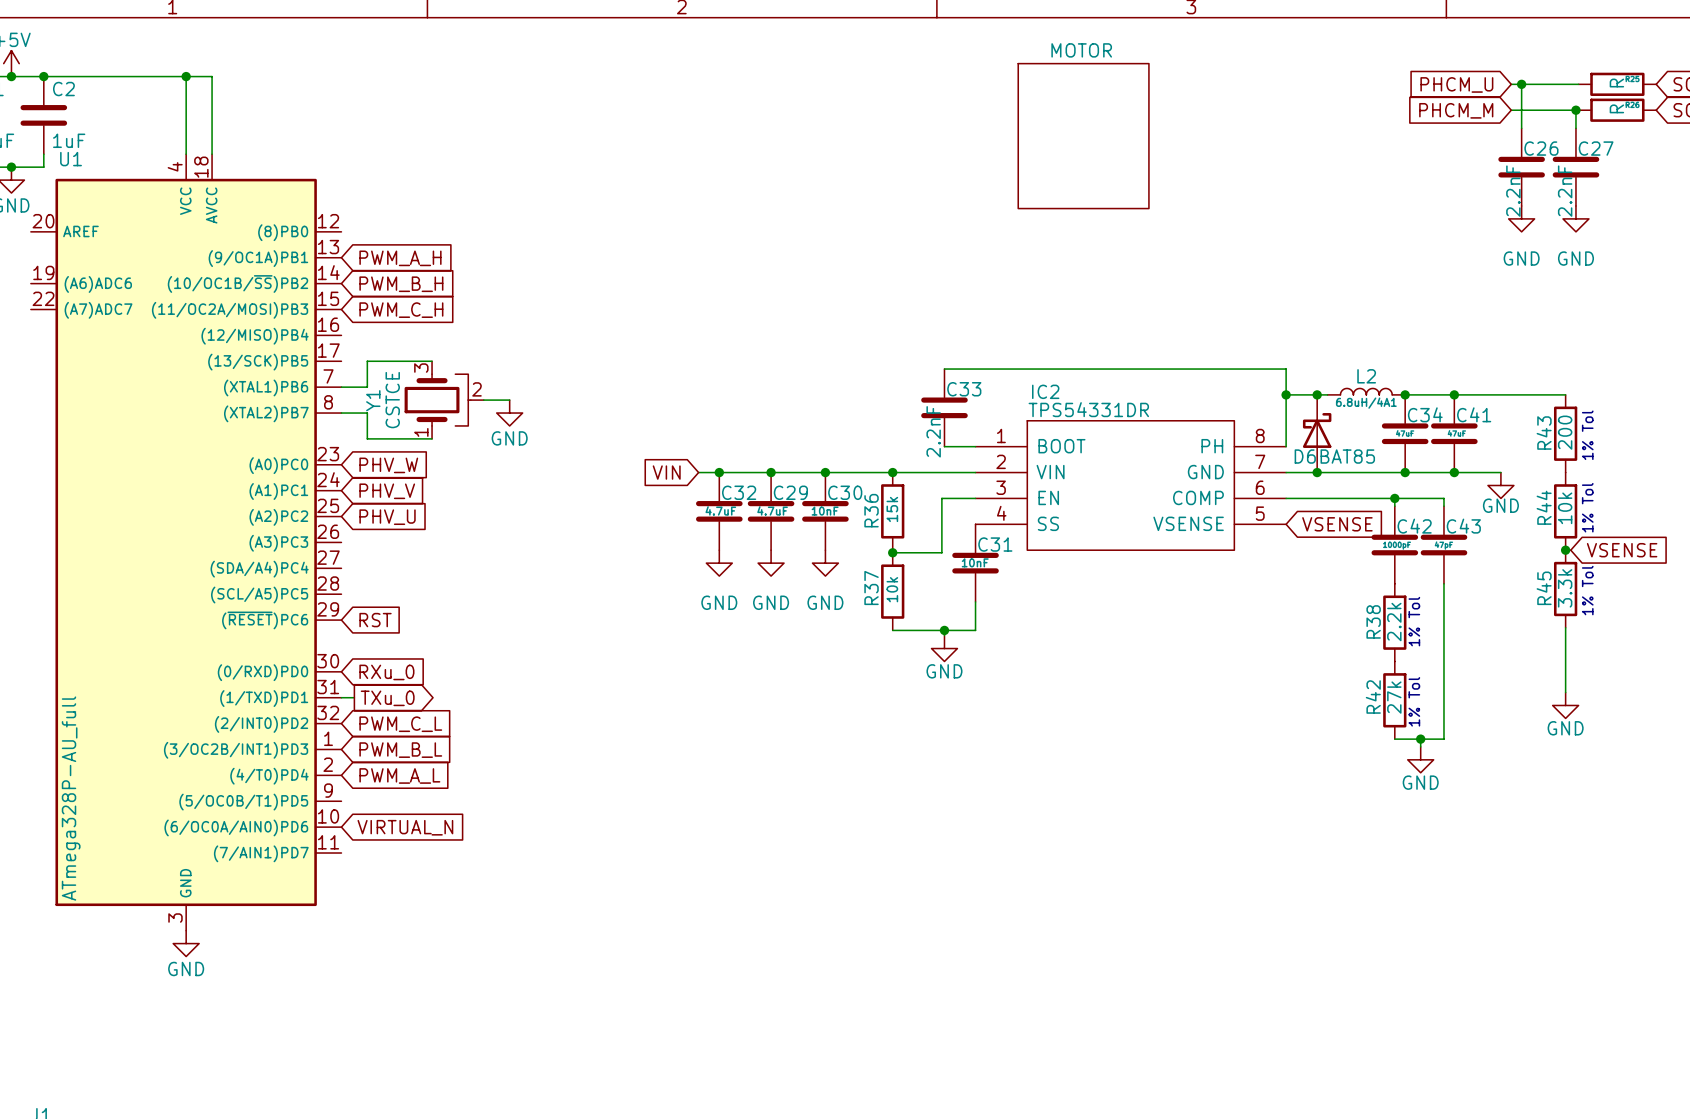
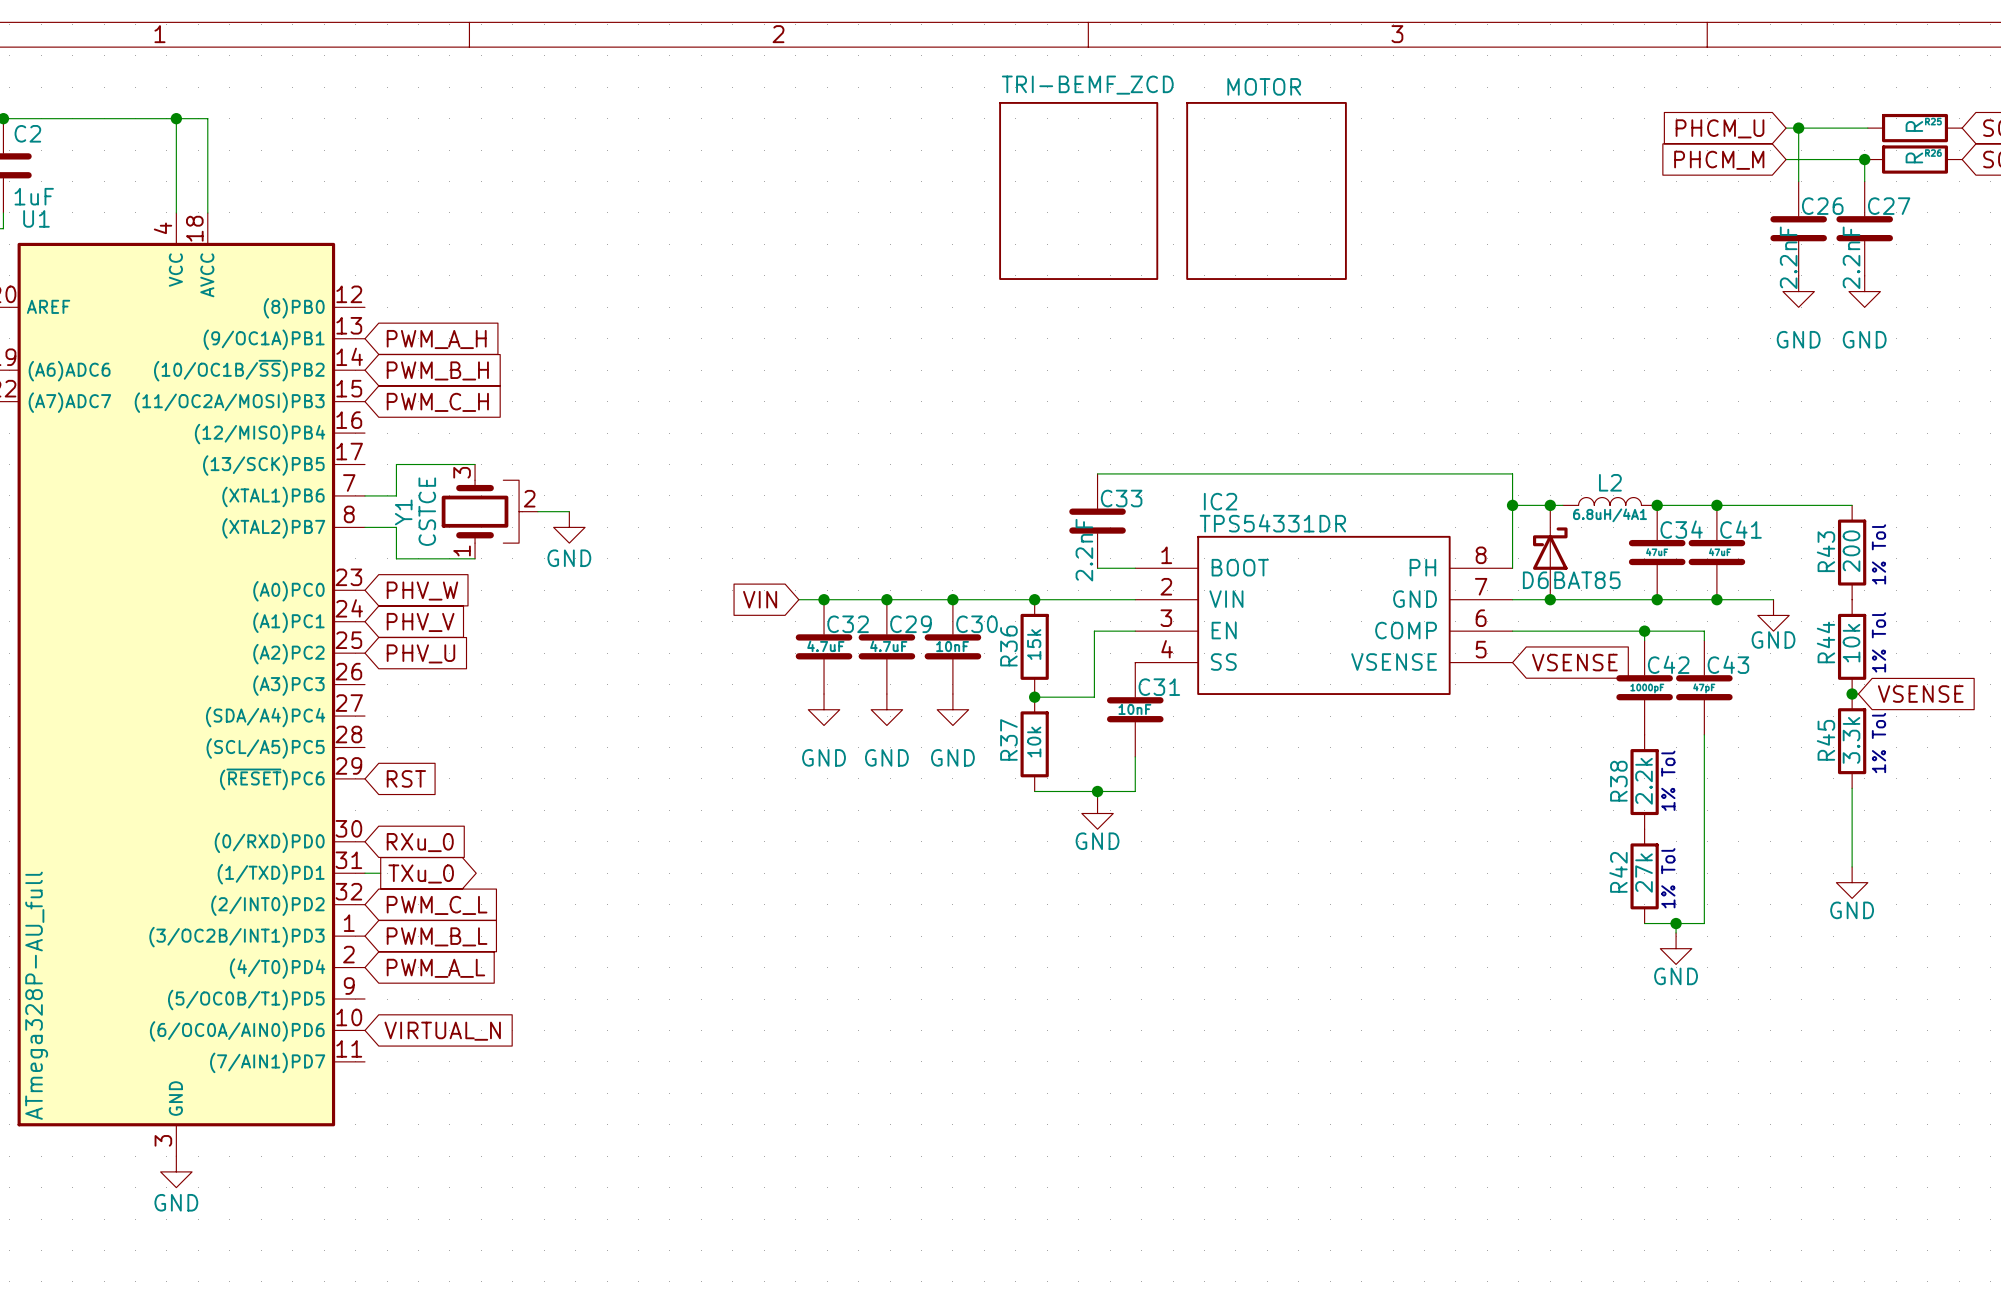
sheet TRI-BEMF_ZCD: none -> (1078, 190)

